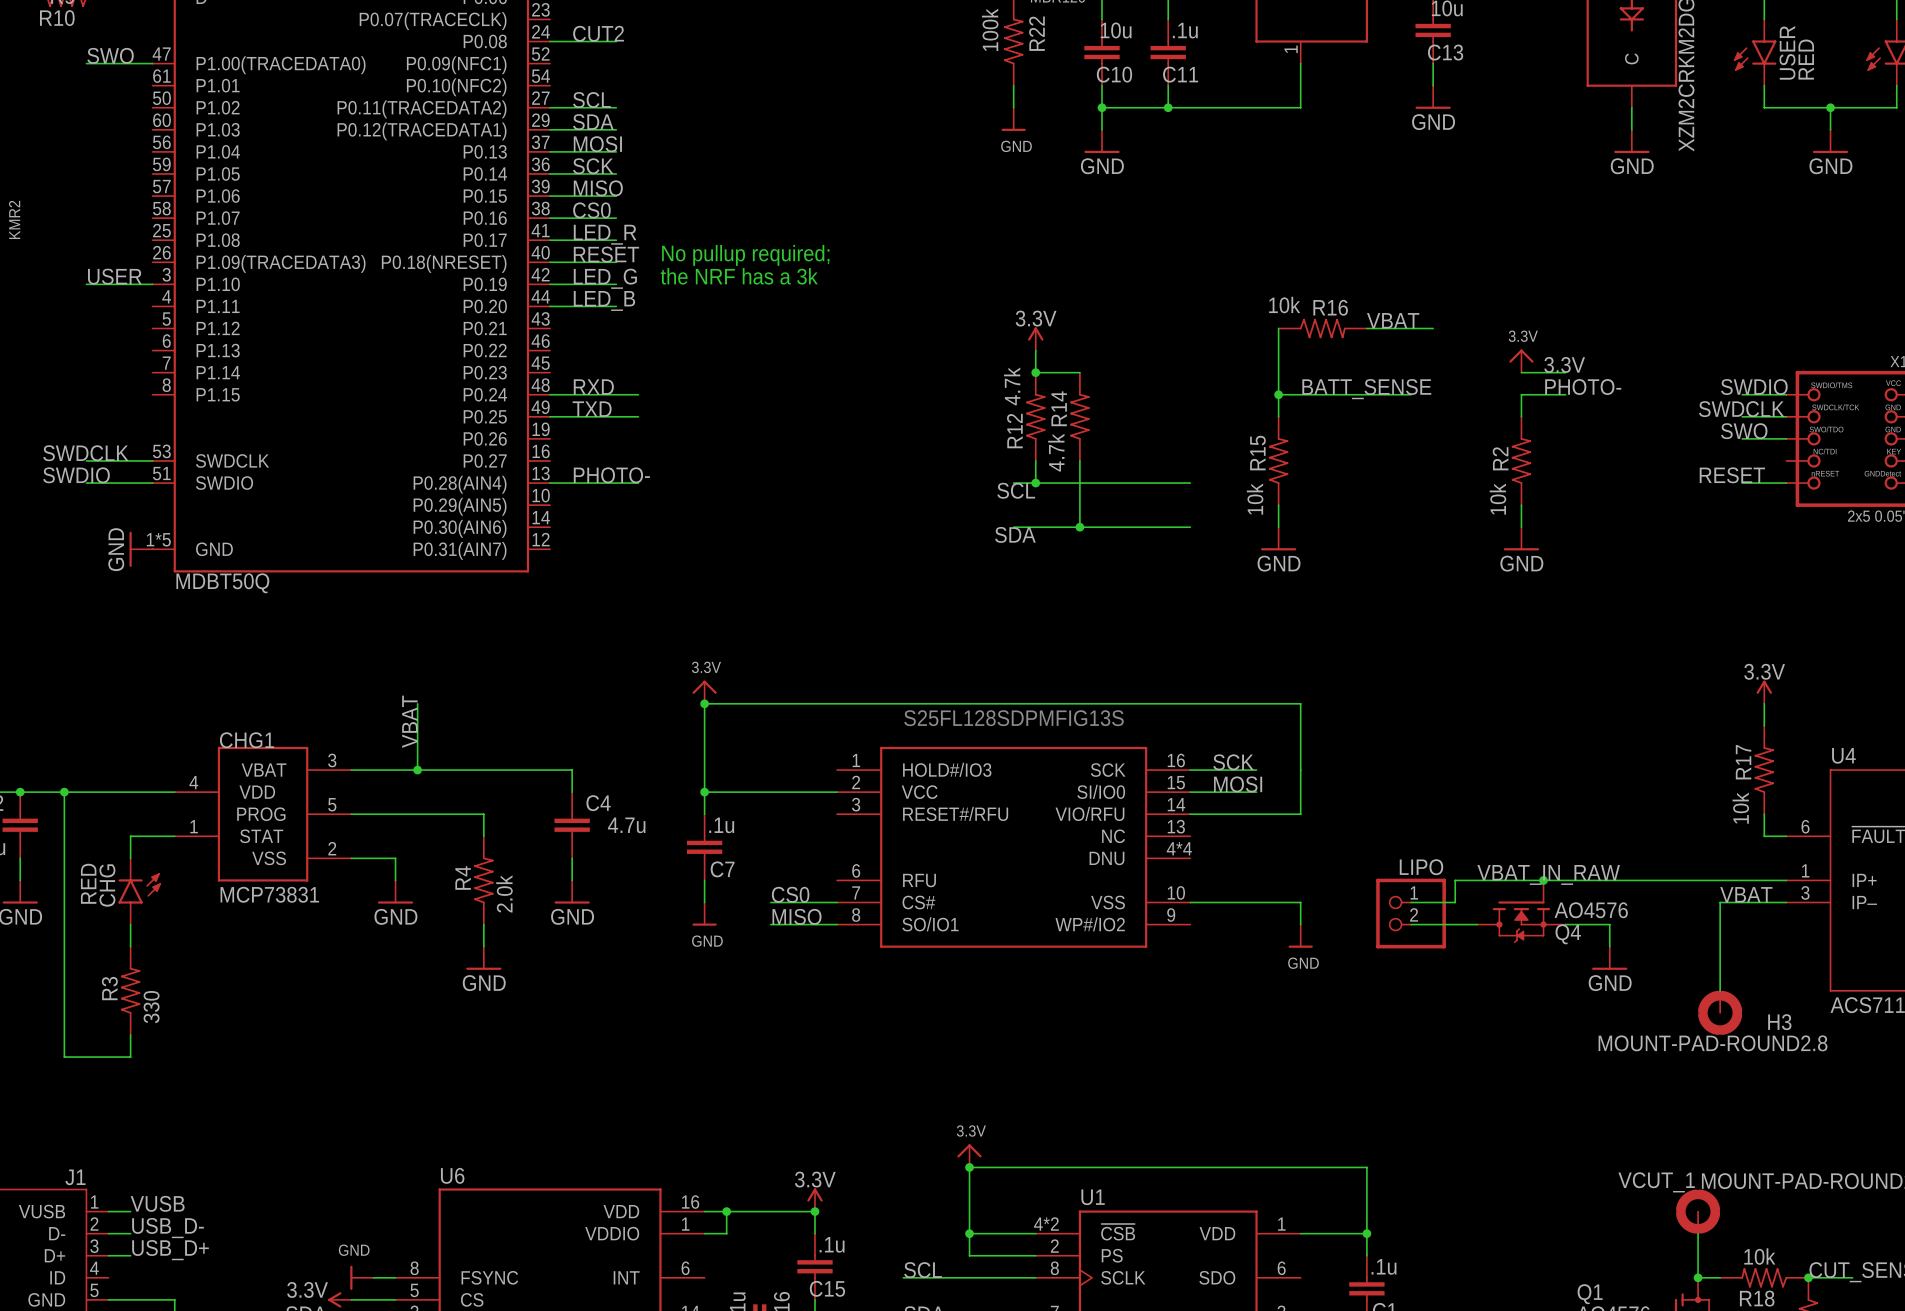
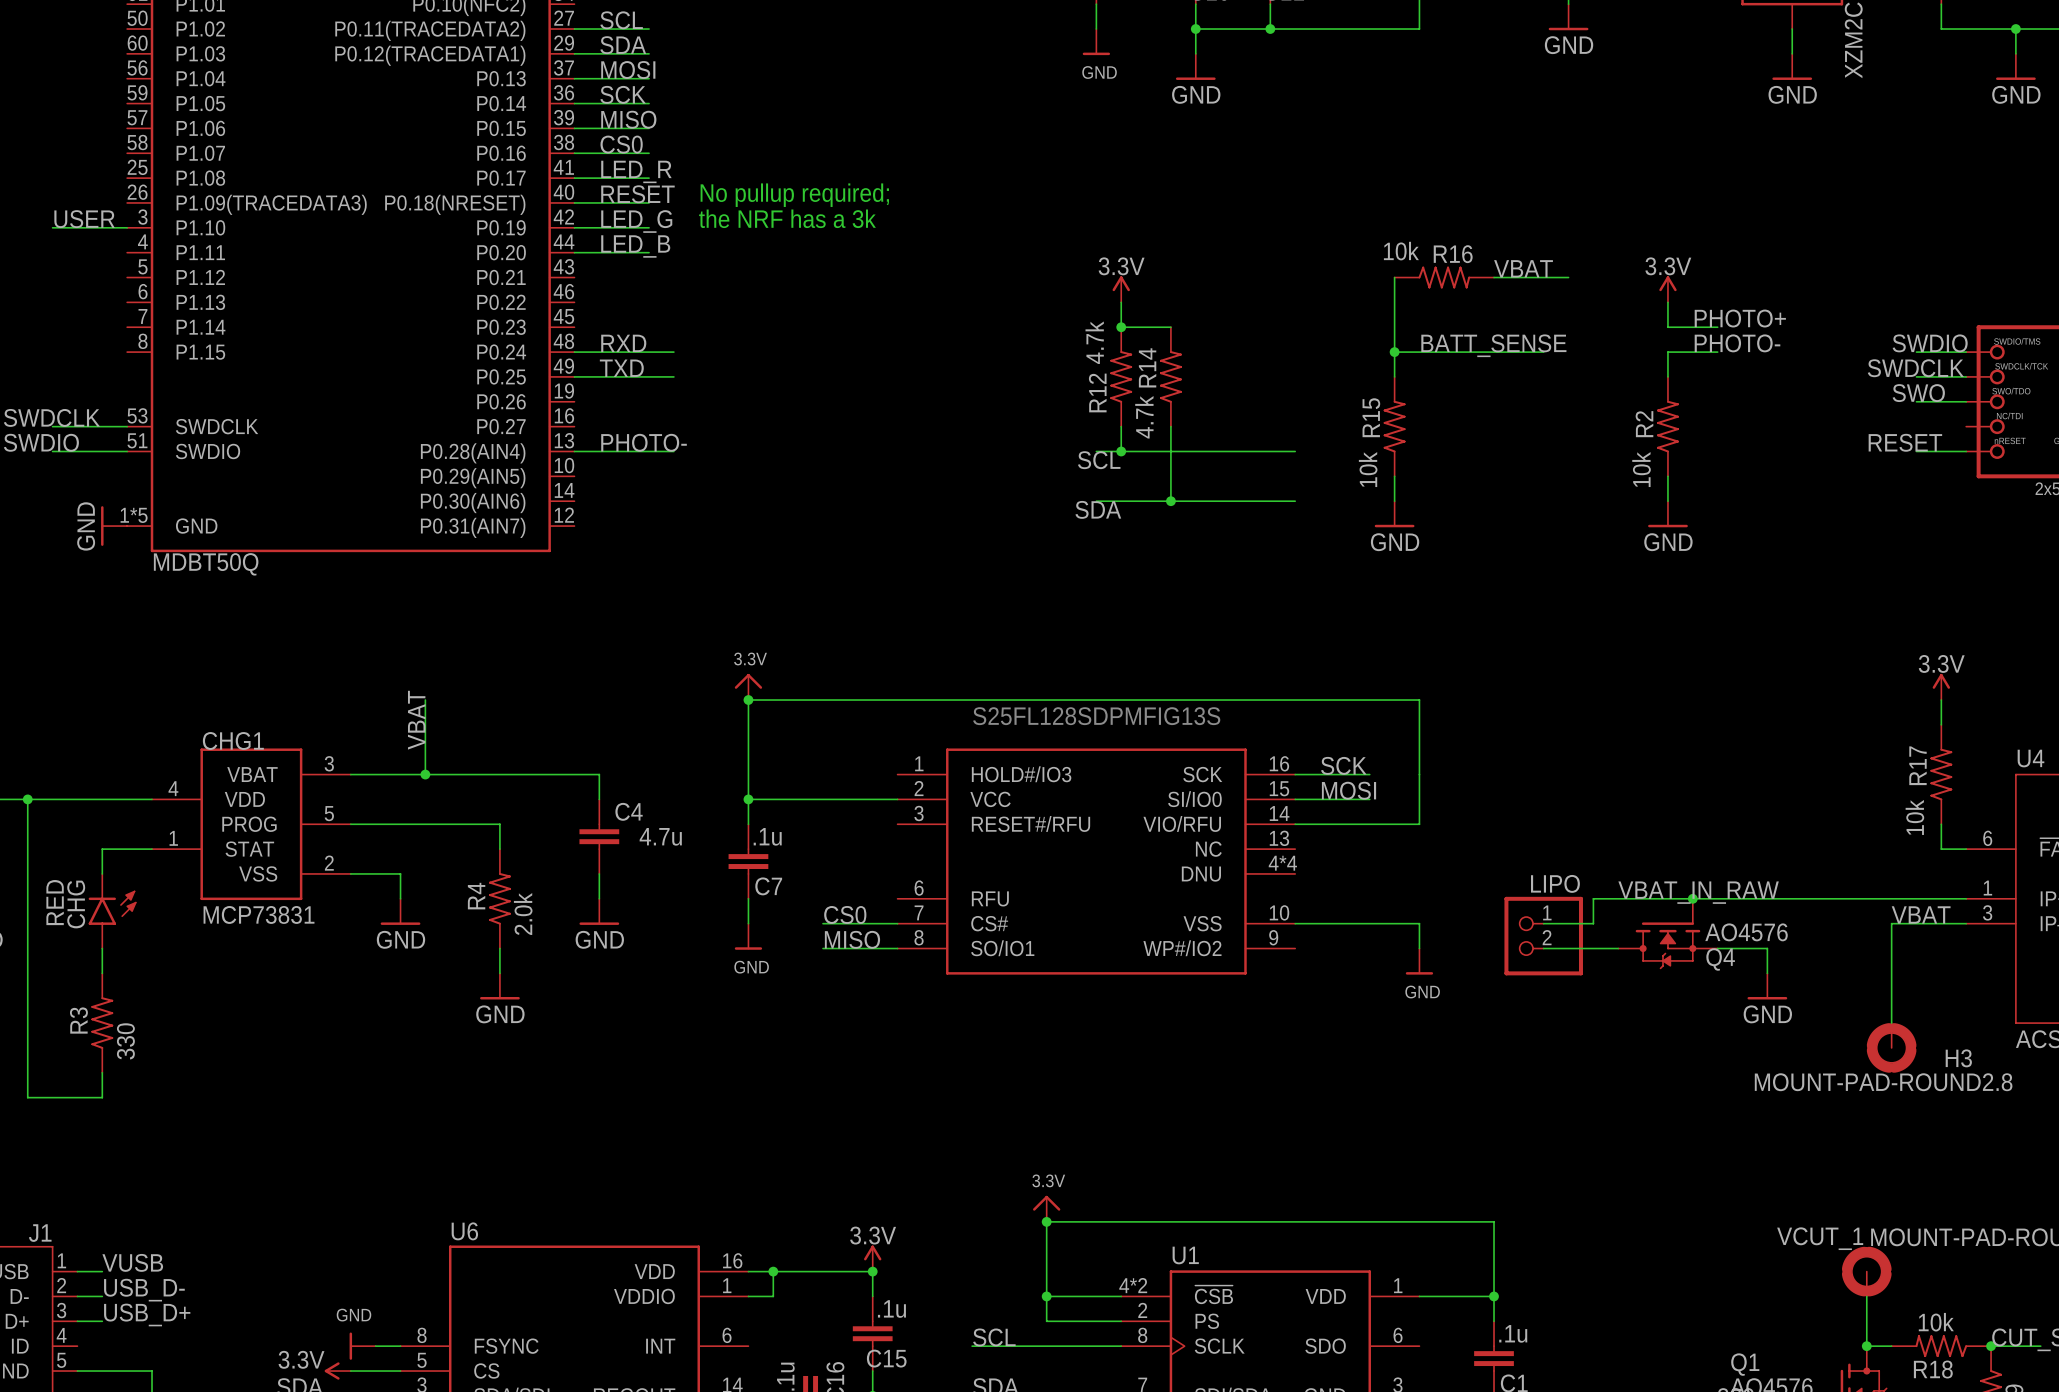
power symbol: none -> 3.3V (1667, 289)
power symbol: 3.3V (1521, 361) -> none
label: 3.3V (1564, 364) -> PHOTO+ (1740, 318)

